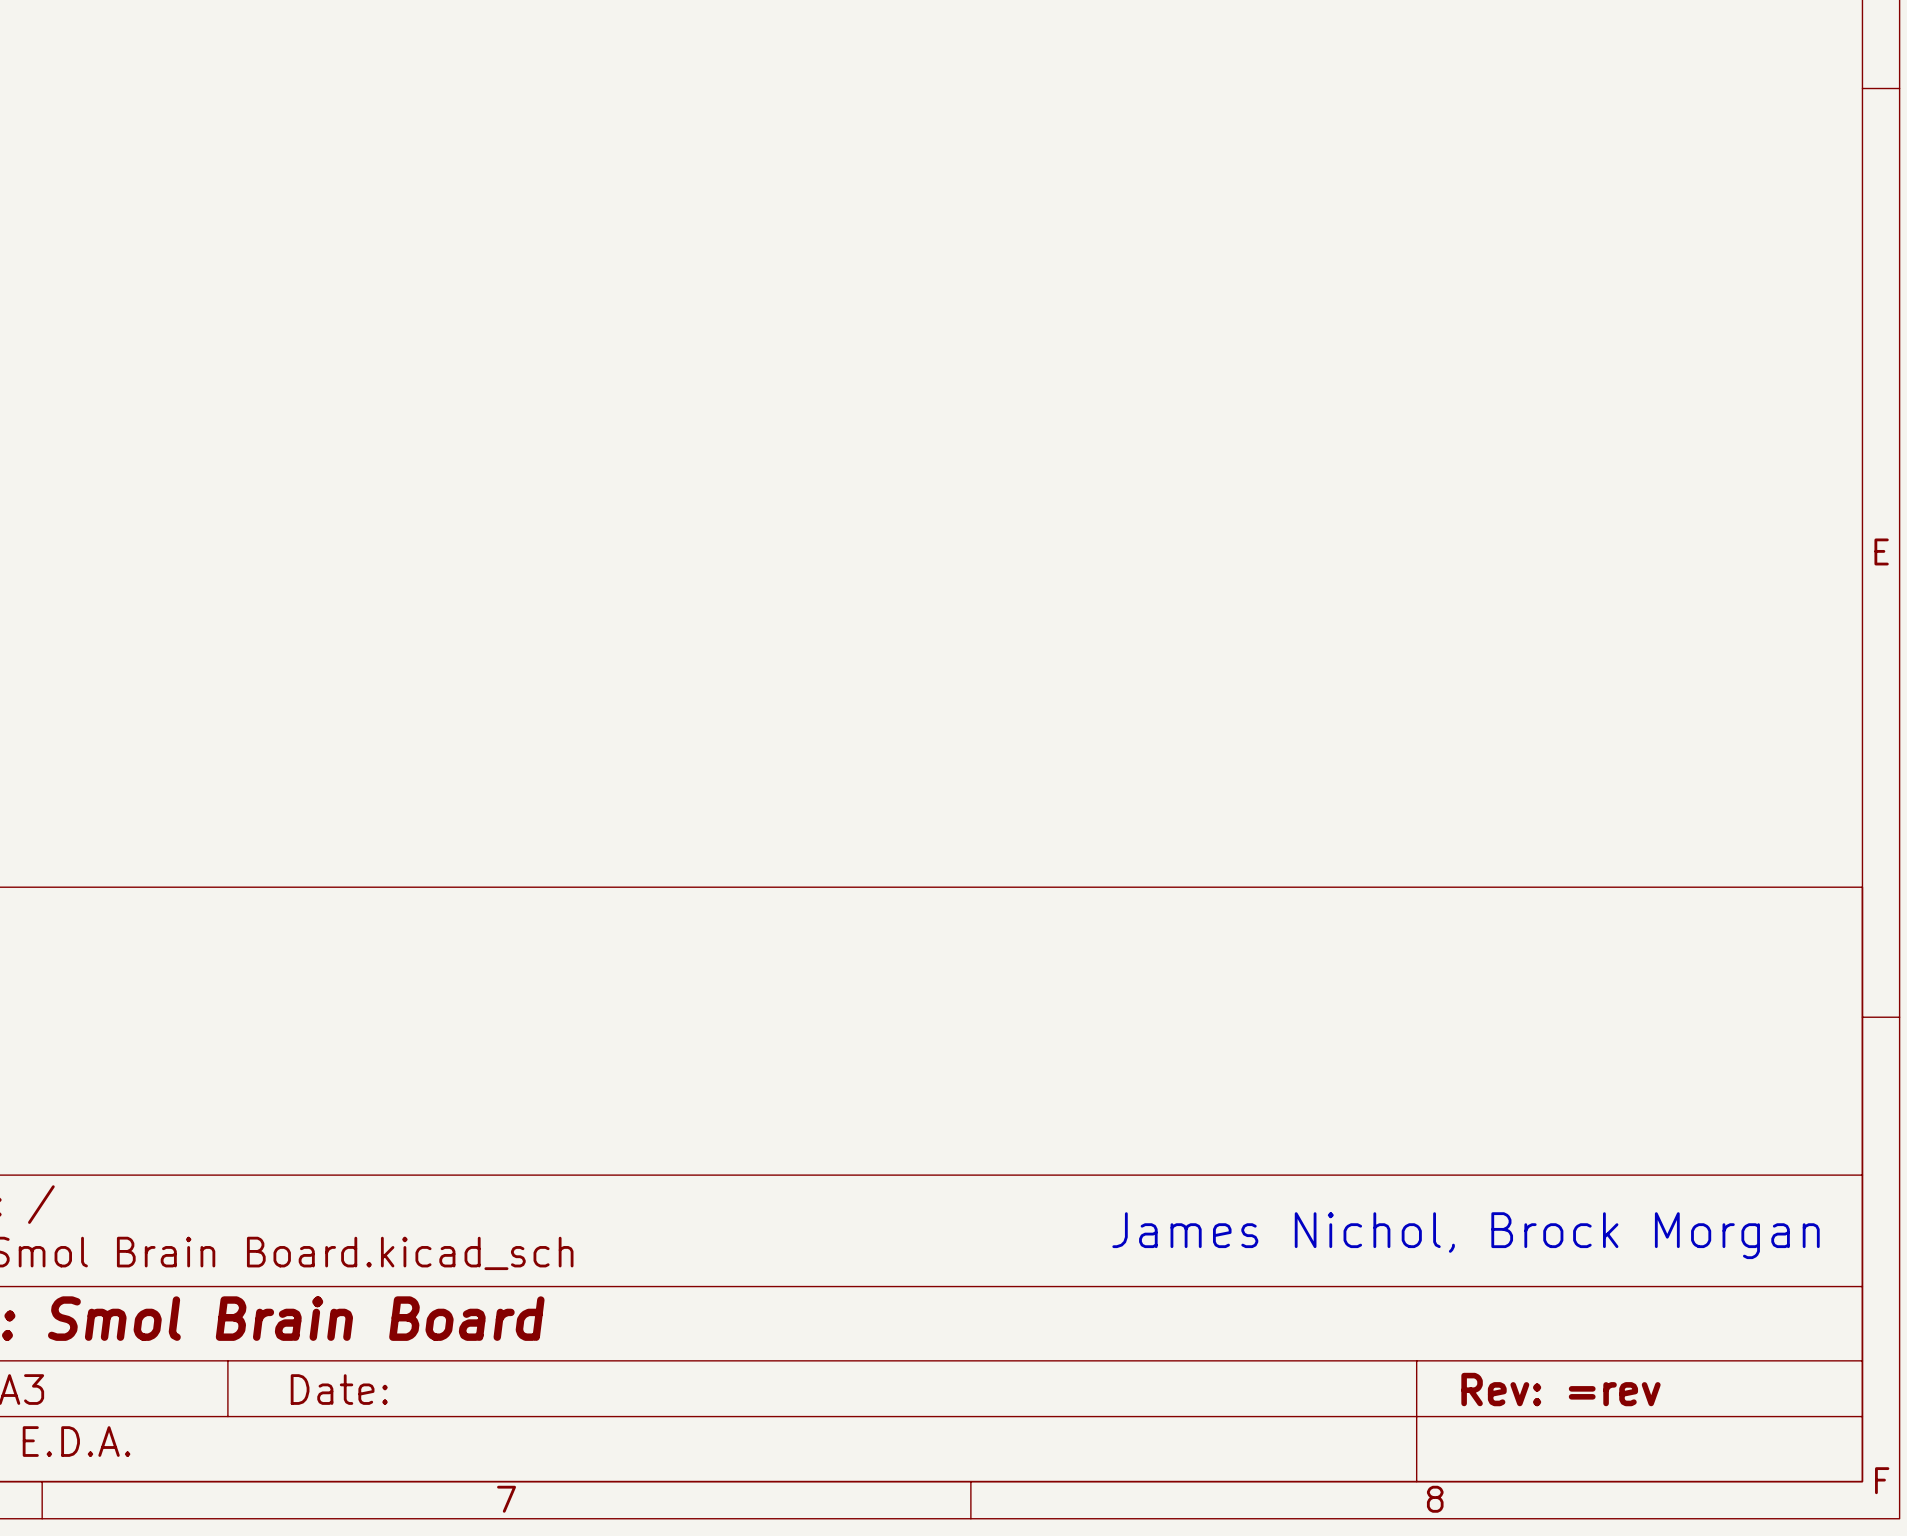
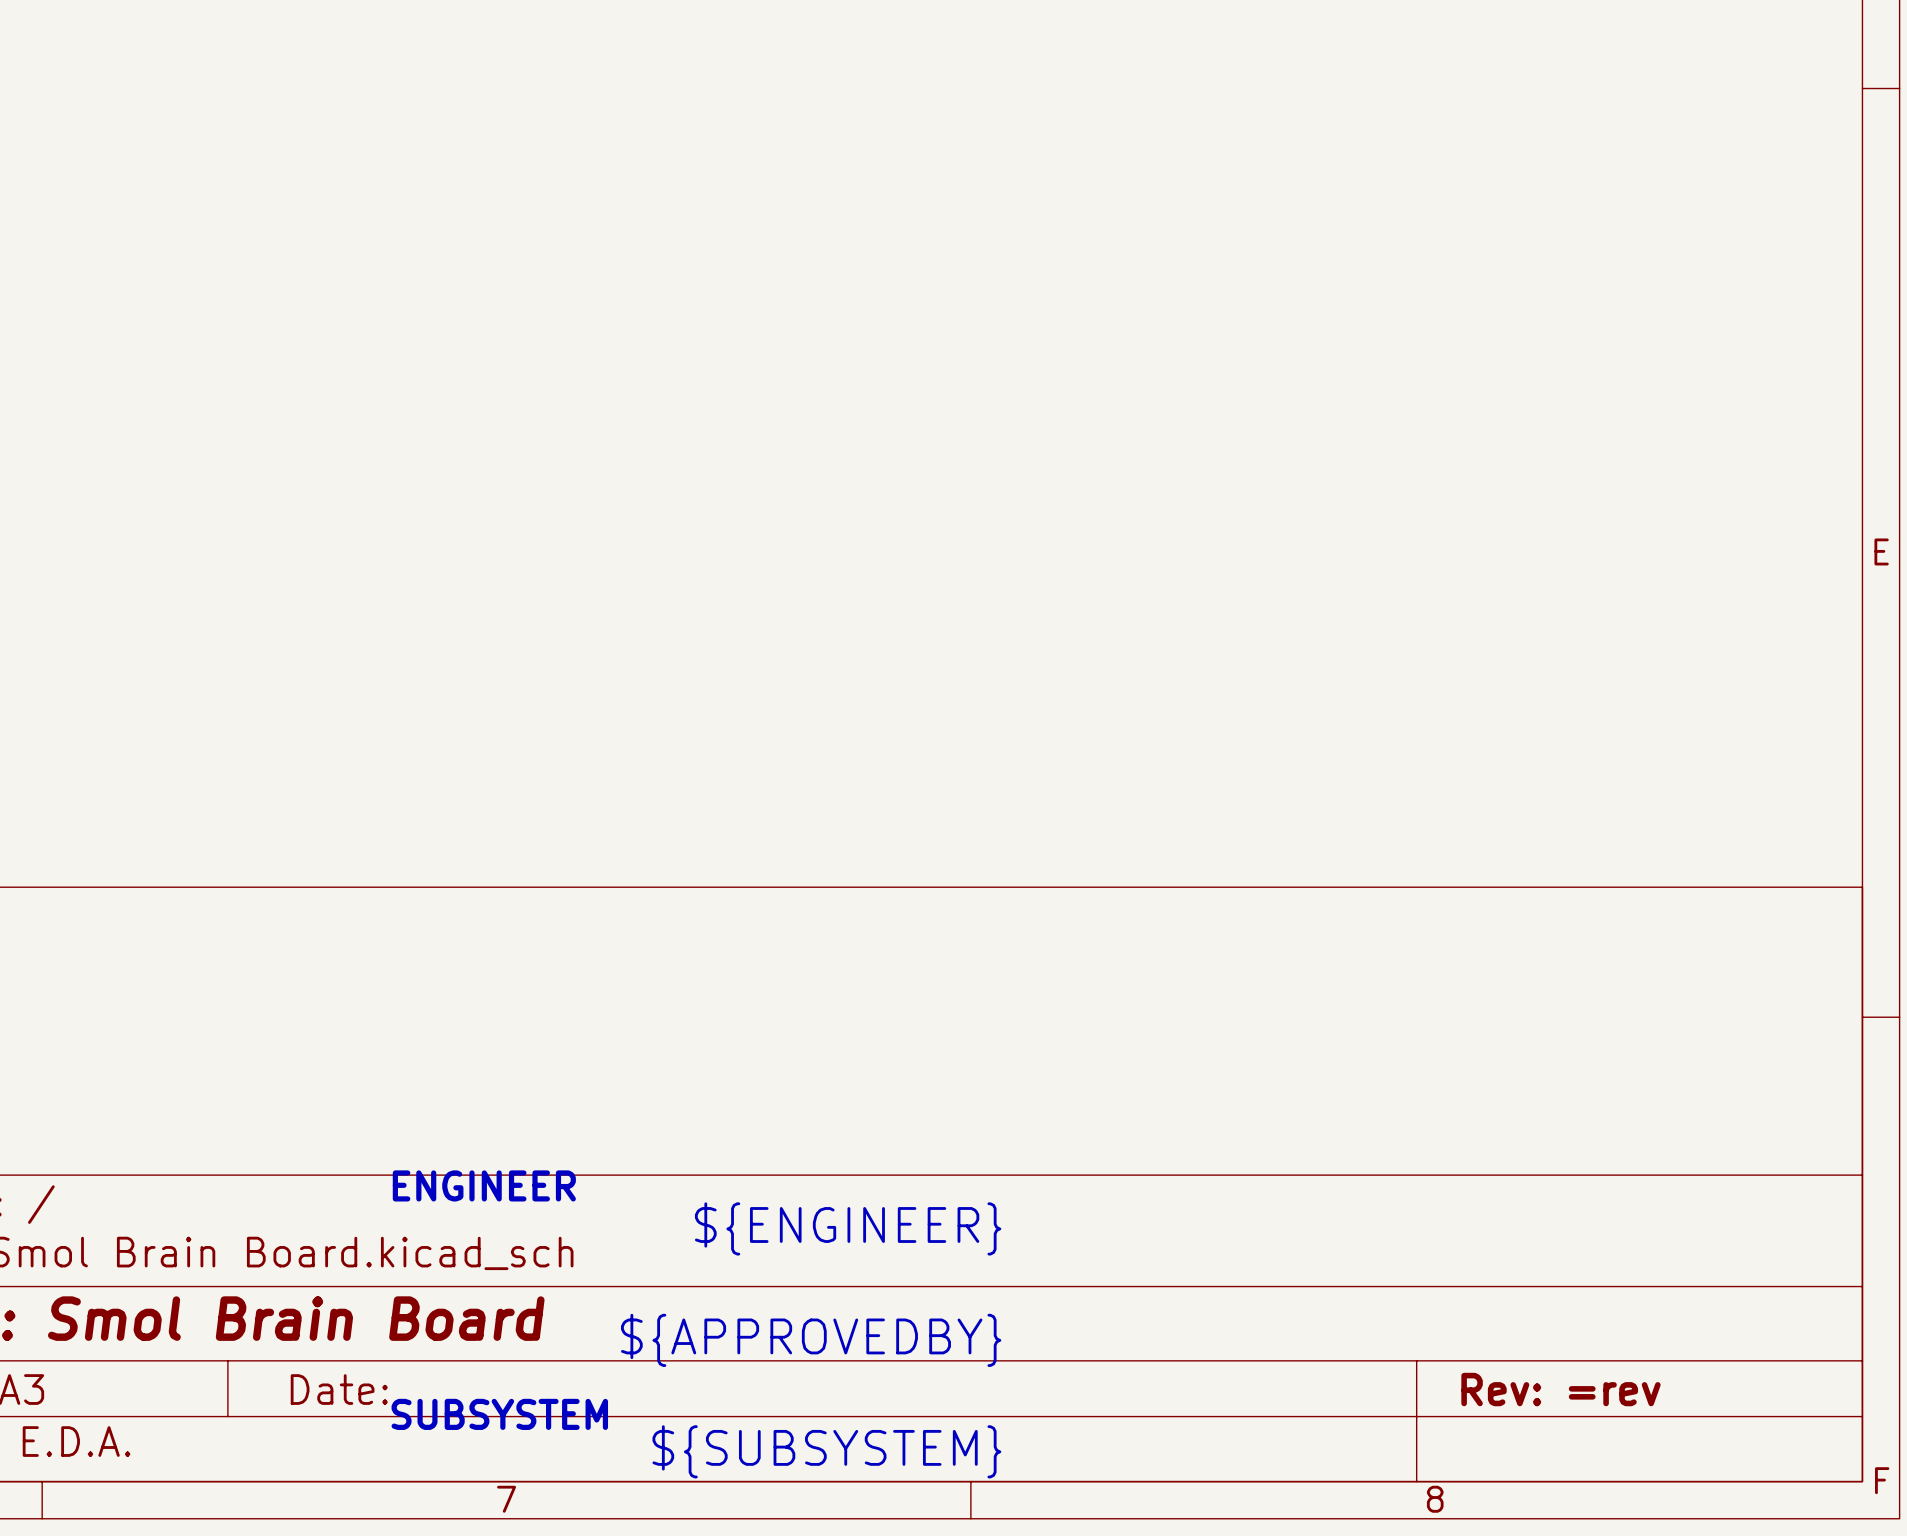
text: none -> ENGINEER (484, 1185)
text: none -> ${ENGINEER} (848, 1228)
text: James Nichol, Brock Morgan (1466, 1235) -> none
text: none -> ${APPROVEDBY} (811, 1340)
text: none -> SUBSYSTEM (499, 1414)
text: none -> ${SUBSYSTEM} (826, 1451)

